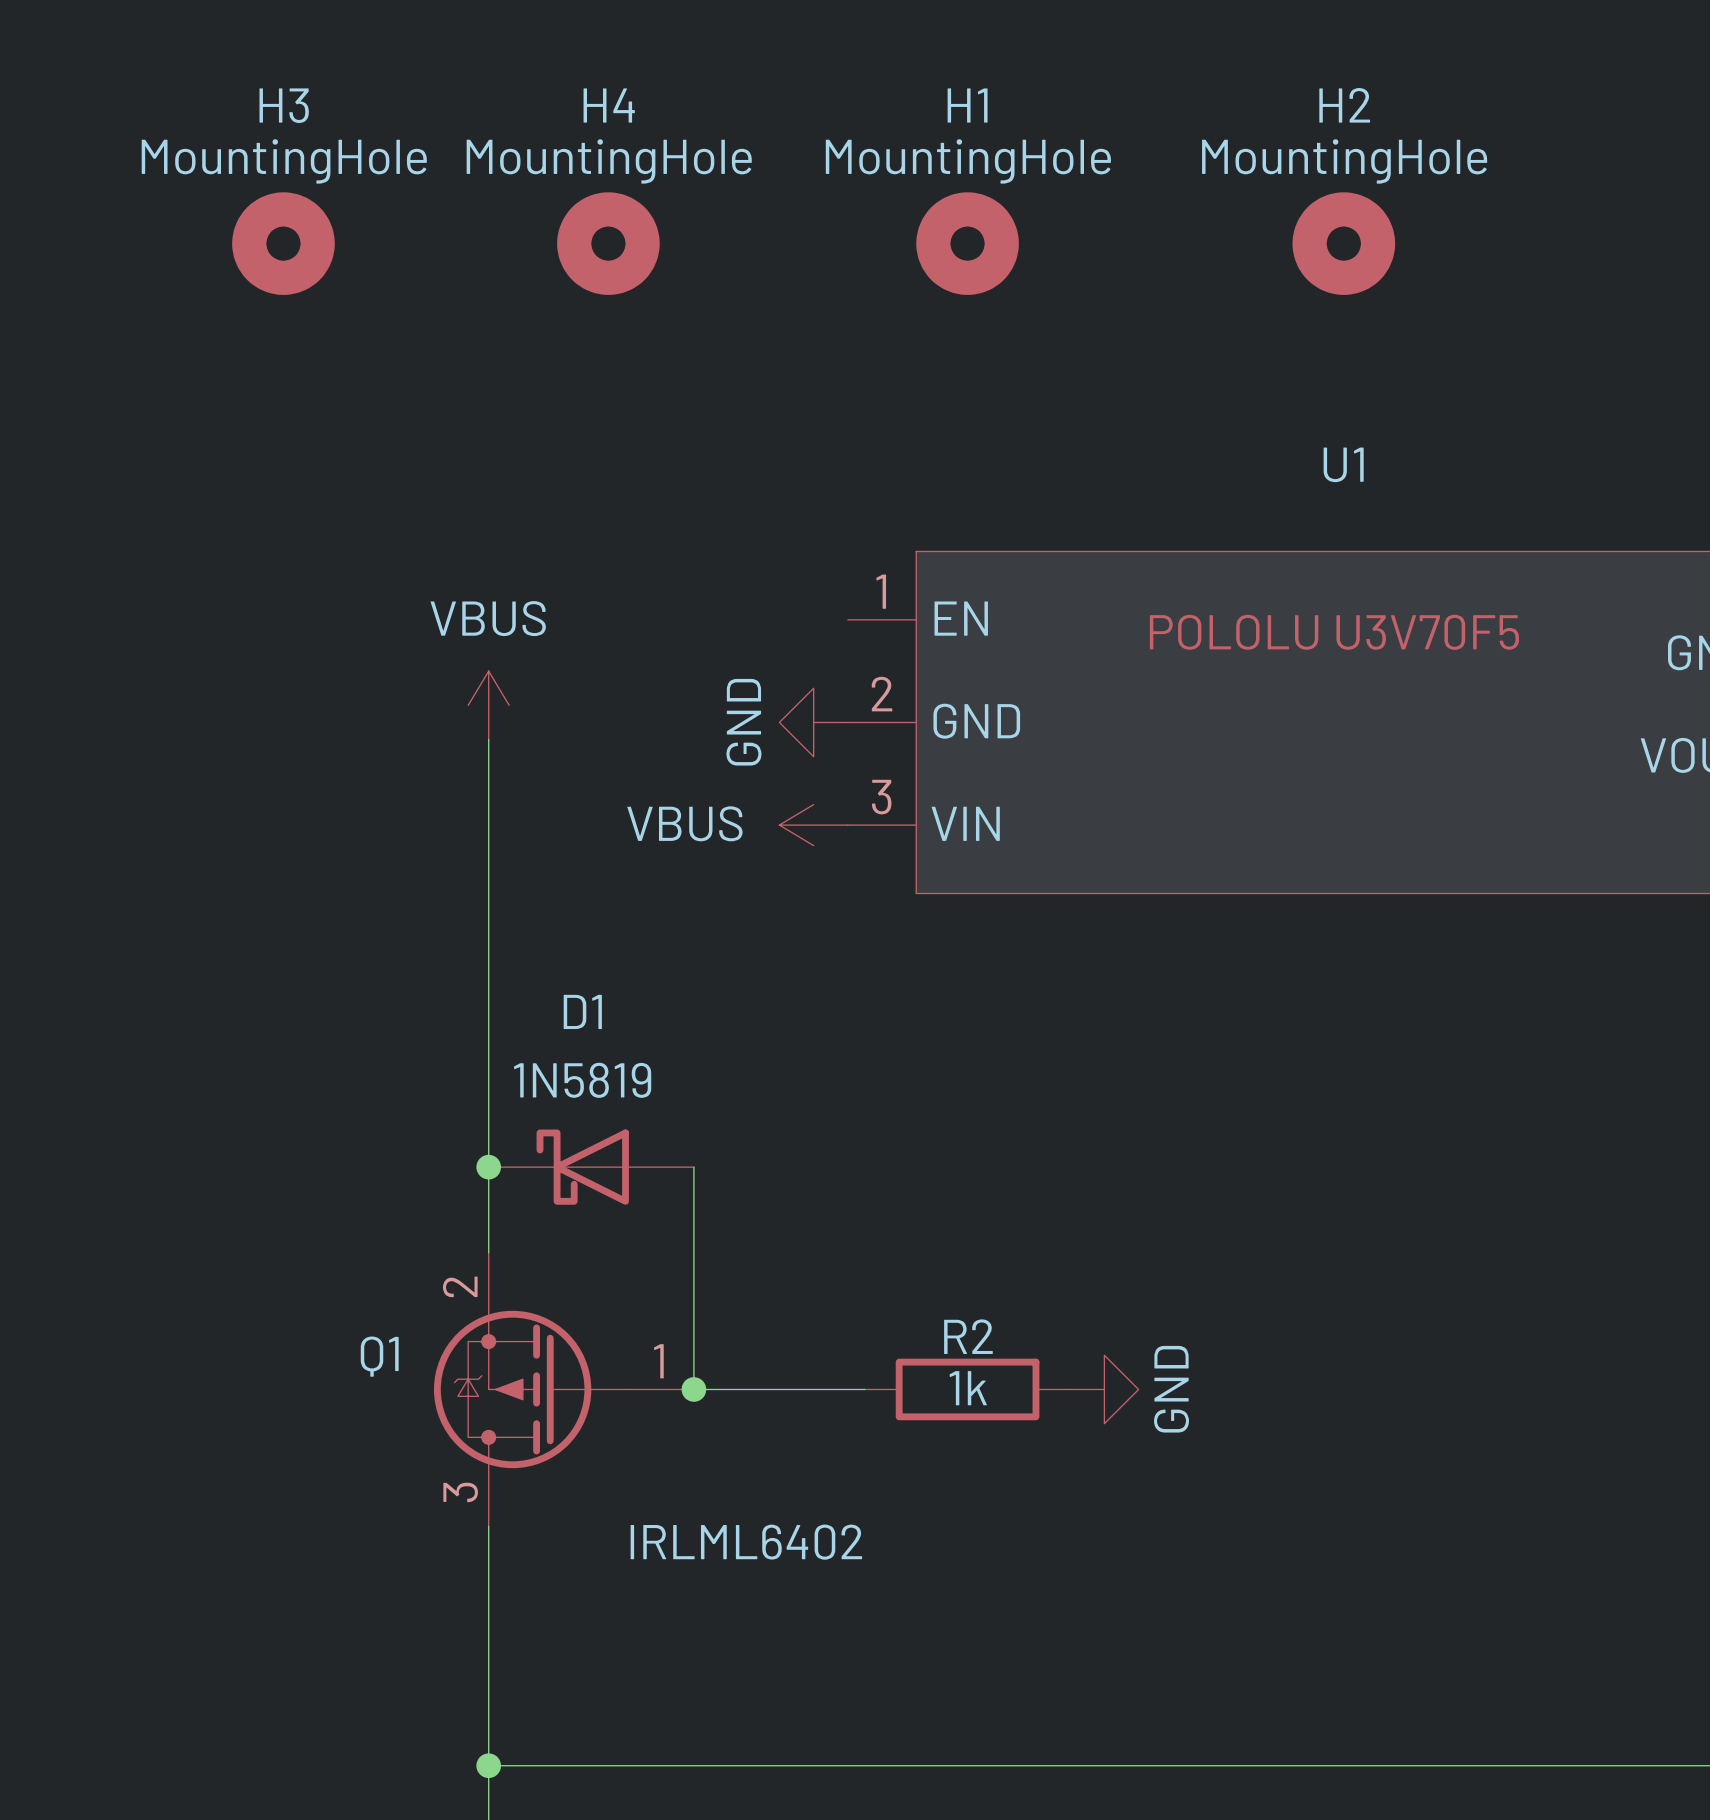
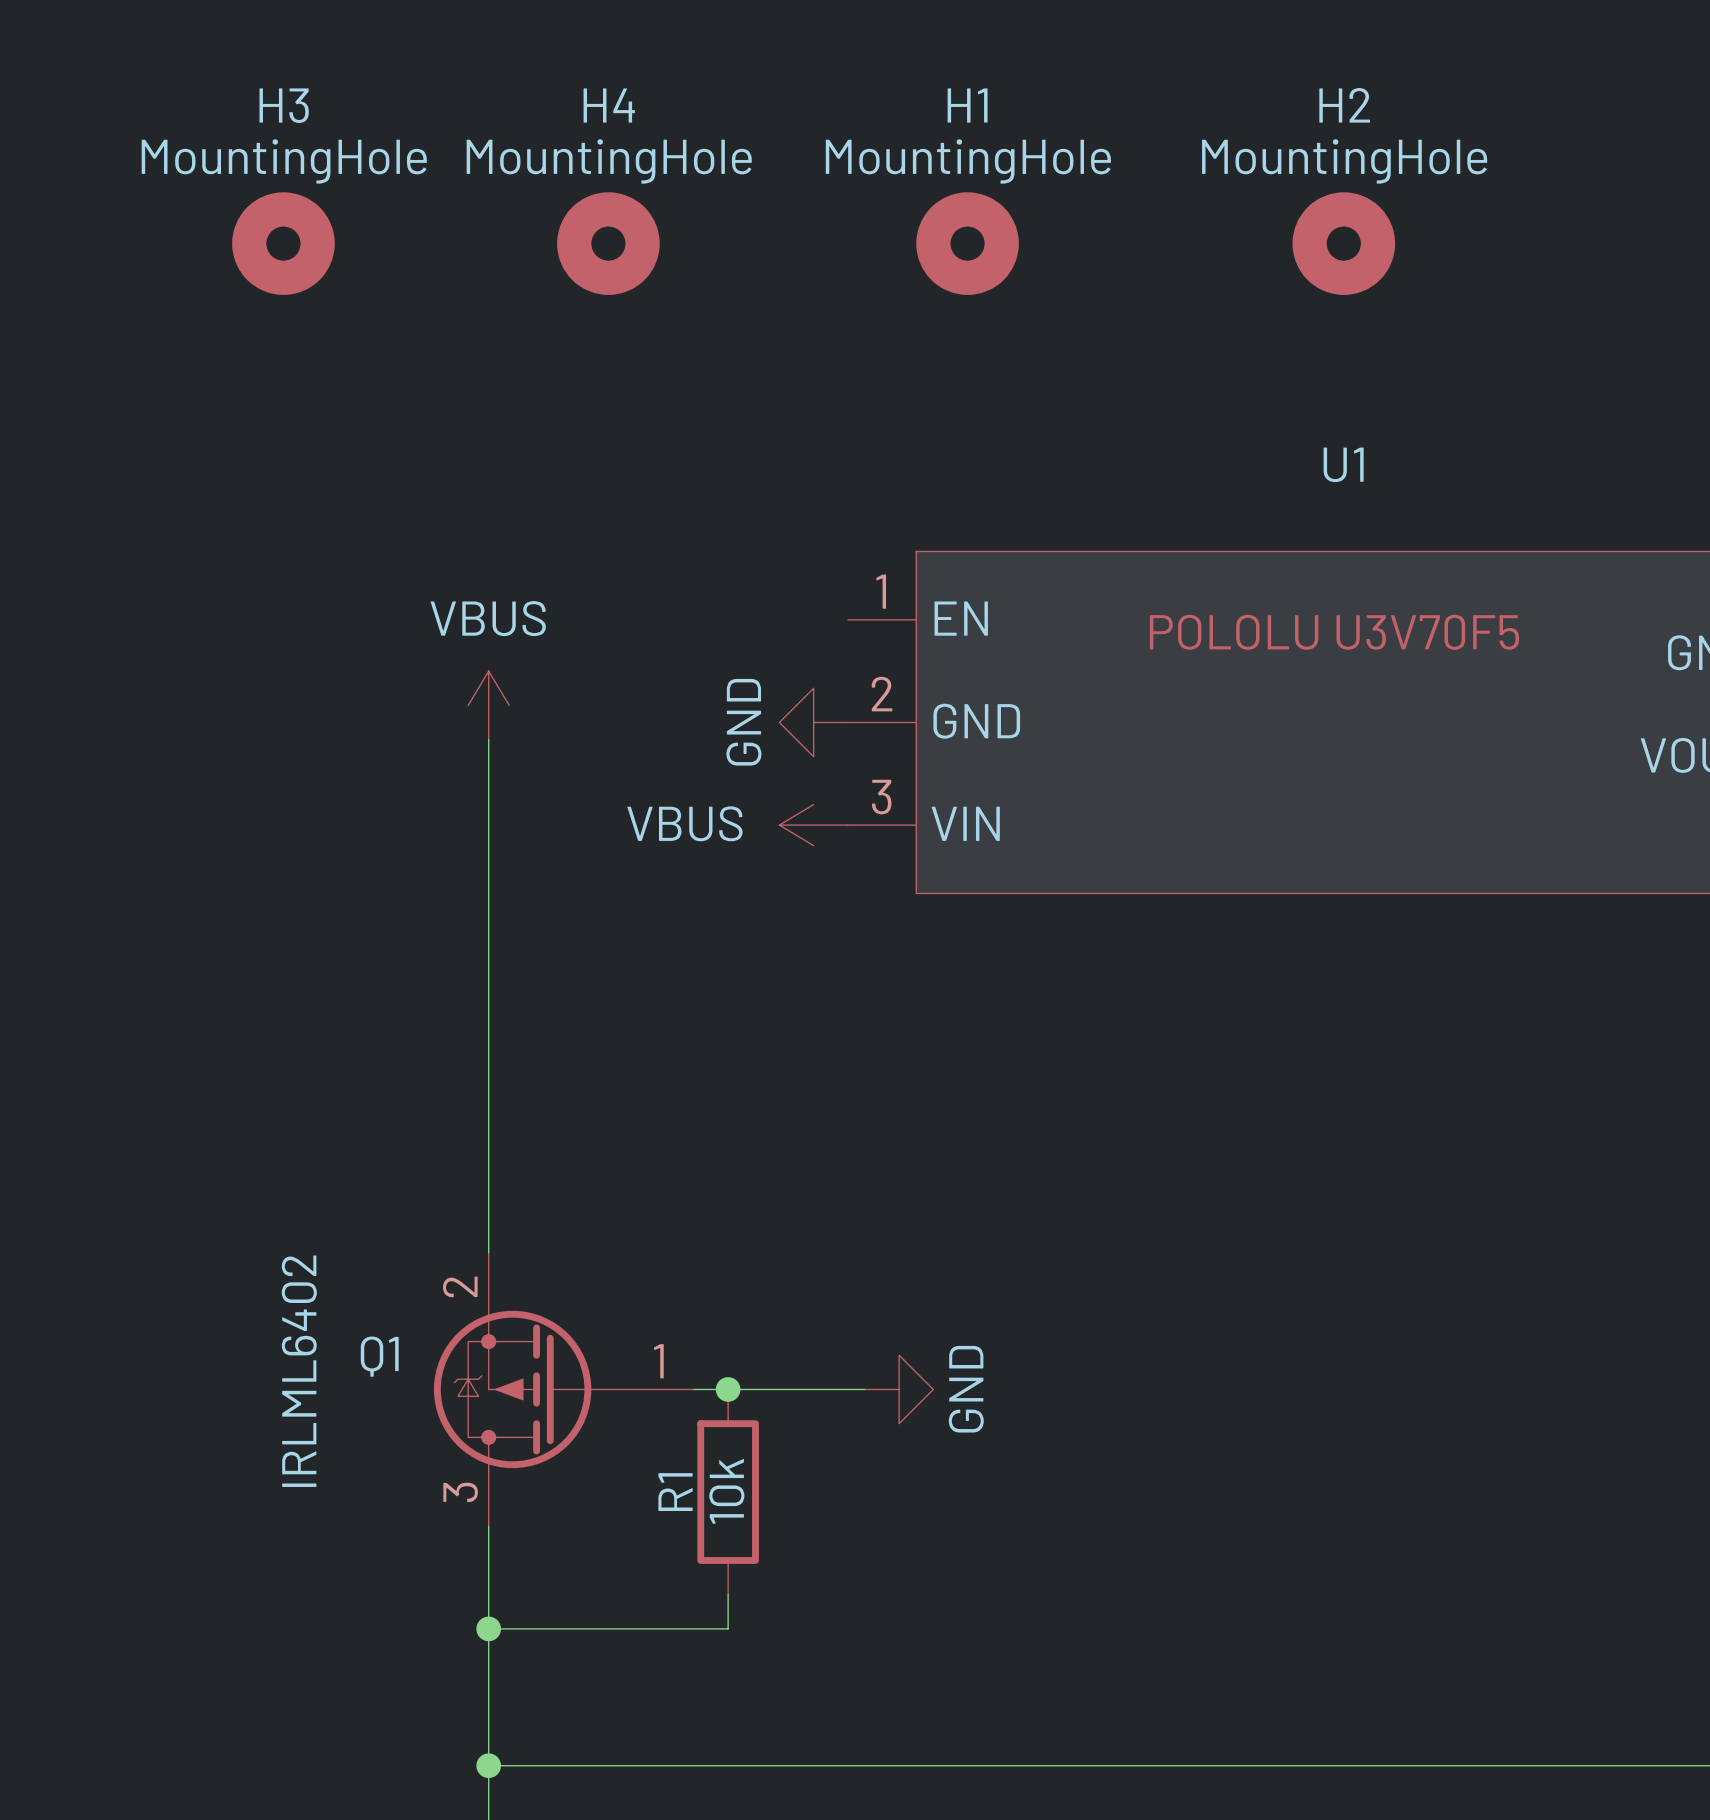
junction: (488, 1167) -> none
D1: 1N5819 (591, 1167) -> none
wire: (693, 1167) (693, 1389) -> none
junction position: (693, 1389) -> (728, 1389)
R2: 1k (967, 1389) -> none
power symbol position: GND (1104, 1389) -> GND (899, 1389)
R1: none -> 10k (728, 1492)
Q1 value rotation: 0° (746, 1542) -> 90° counterclockwise (299, 1371)
Q1 value position: IRLML6402 (746, 1542) -> IRLML6402 (299, 1371)
wire: none -> (728, 1594) (728, 1628) (488, 1628)
junction: none -> (488, 1628)

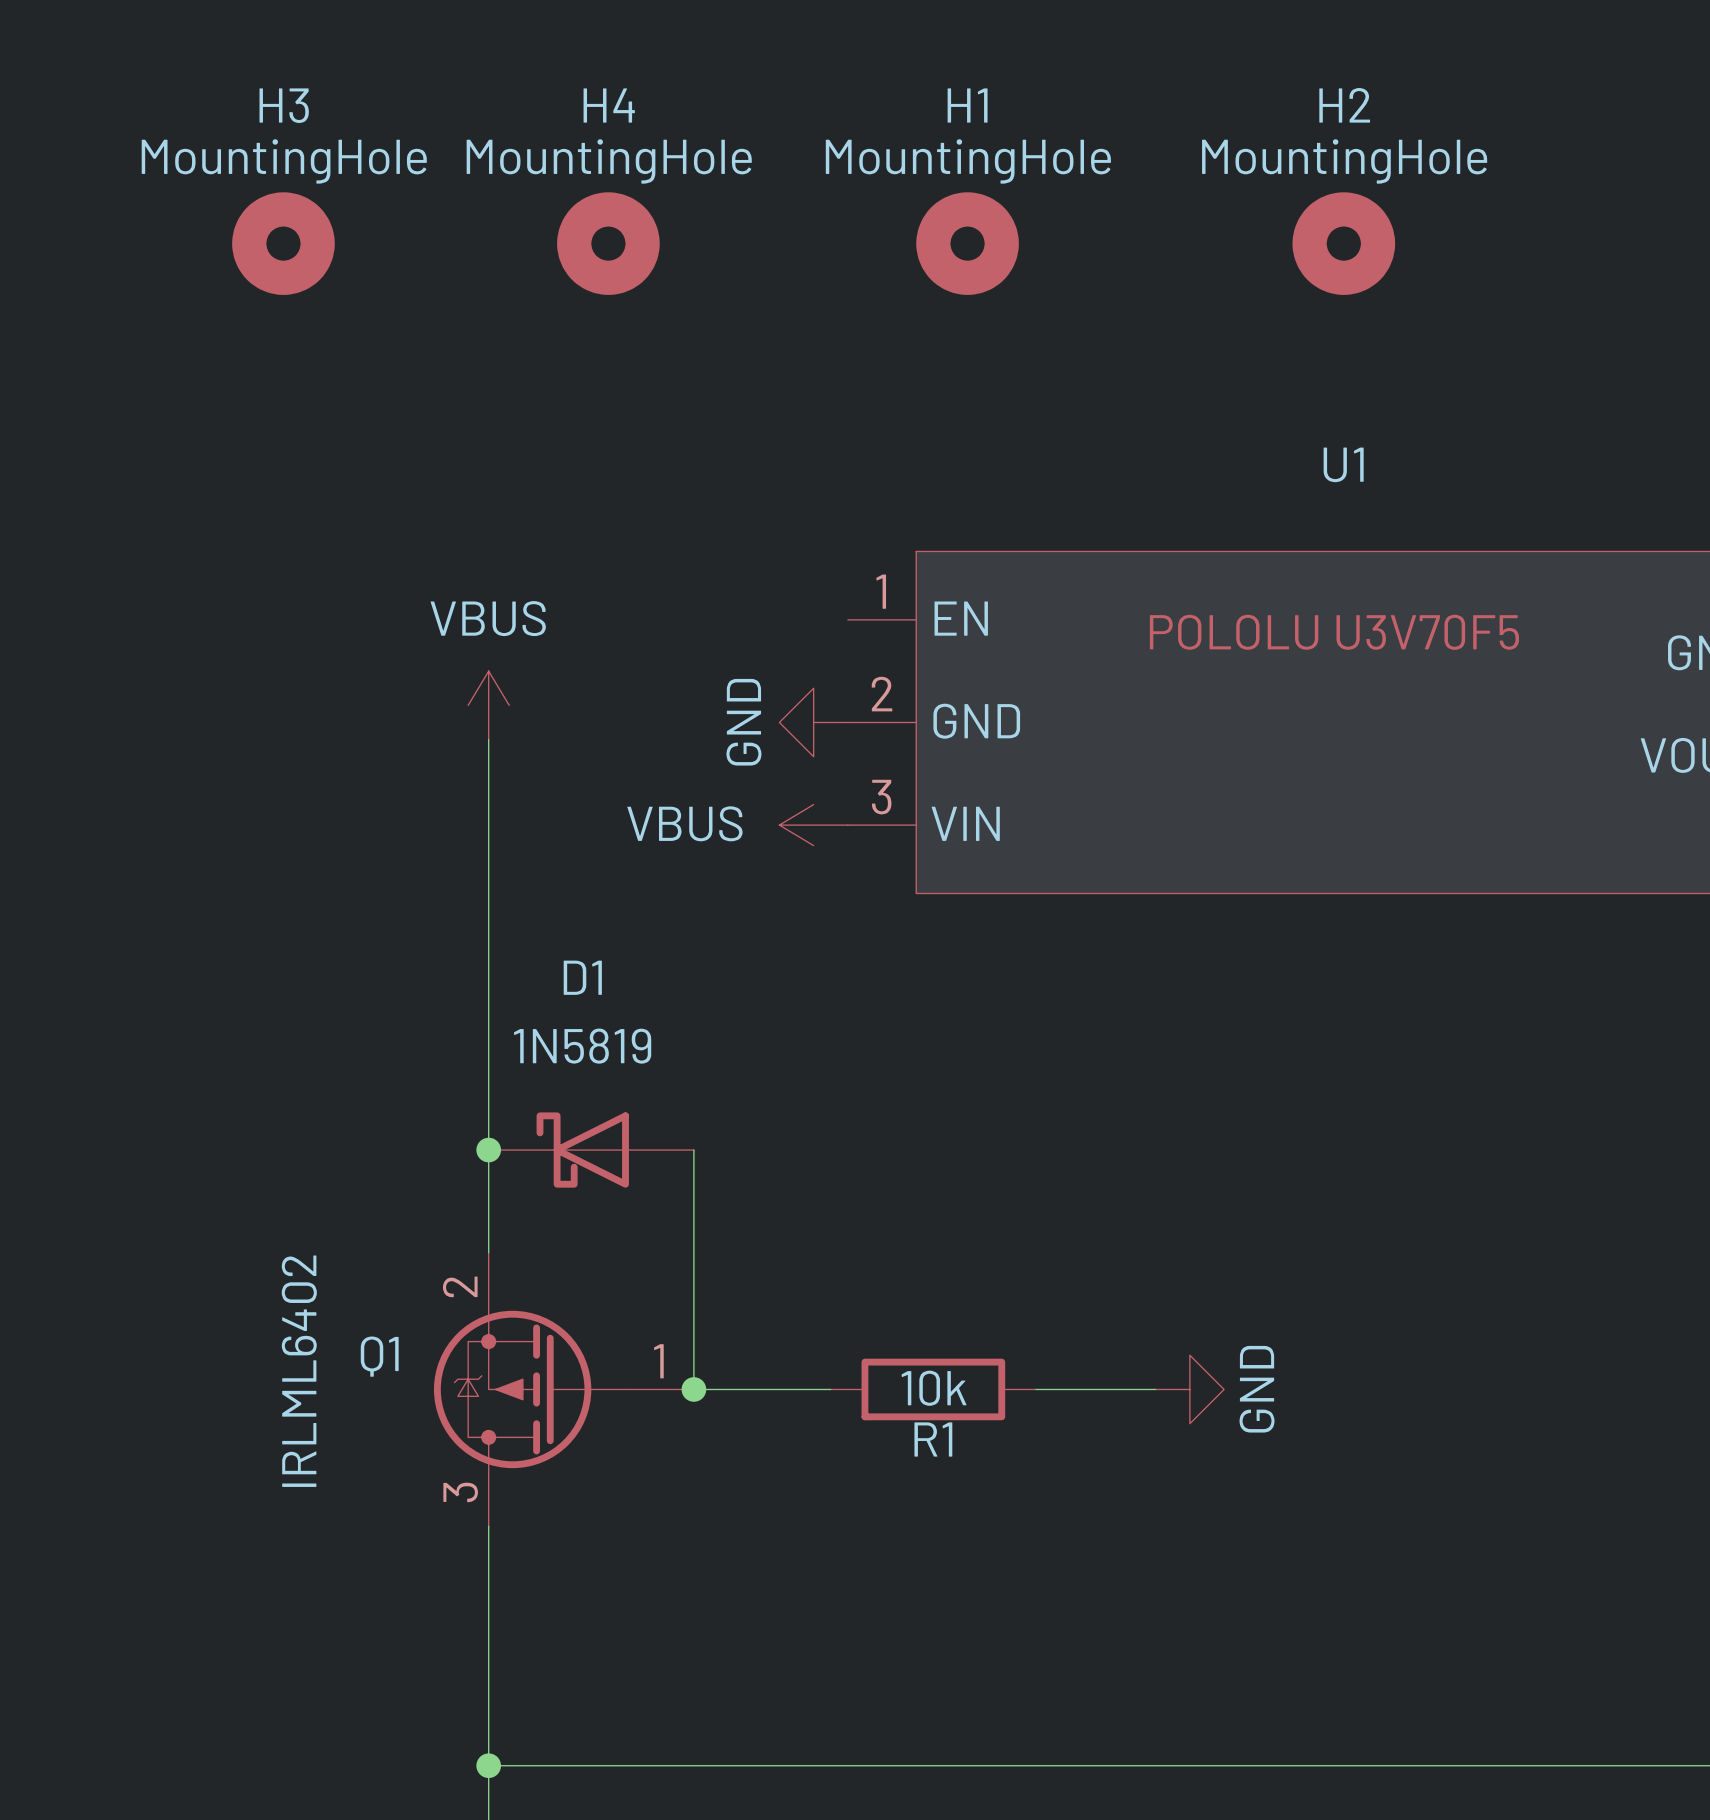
junction: none -> (488, 1150)
D1: none -> 1N5819 (591, 1150)
wire: none -> (693, 1150) (693, 1389)
junction position: (728, 1389) -> (693, 1389)
power symbol position: GND (899, 1389) -> GND (1189, 1389)
wire: none -> (1035, 1389) (1155, 1389)
R1 name position: R1 (675, 1492) -> R1 (933, 1439)
R1 rotation: 0° (728, 1492) -> 90° clockwise (933, 1389)
R1 position: (728, 1492) -> (933, 1389)
wire: (728, 1594) (728, 1628) (488, 1628) -> none
junction: (488, 1628) -> none

